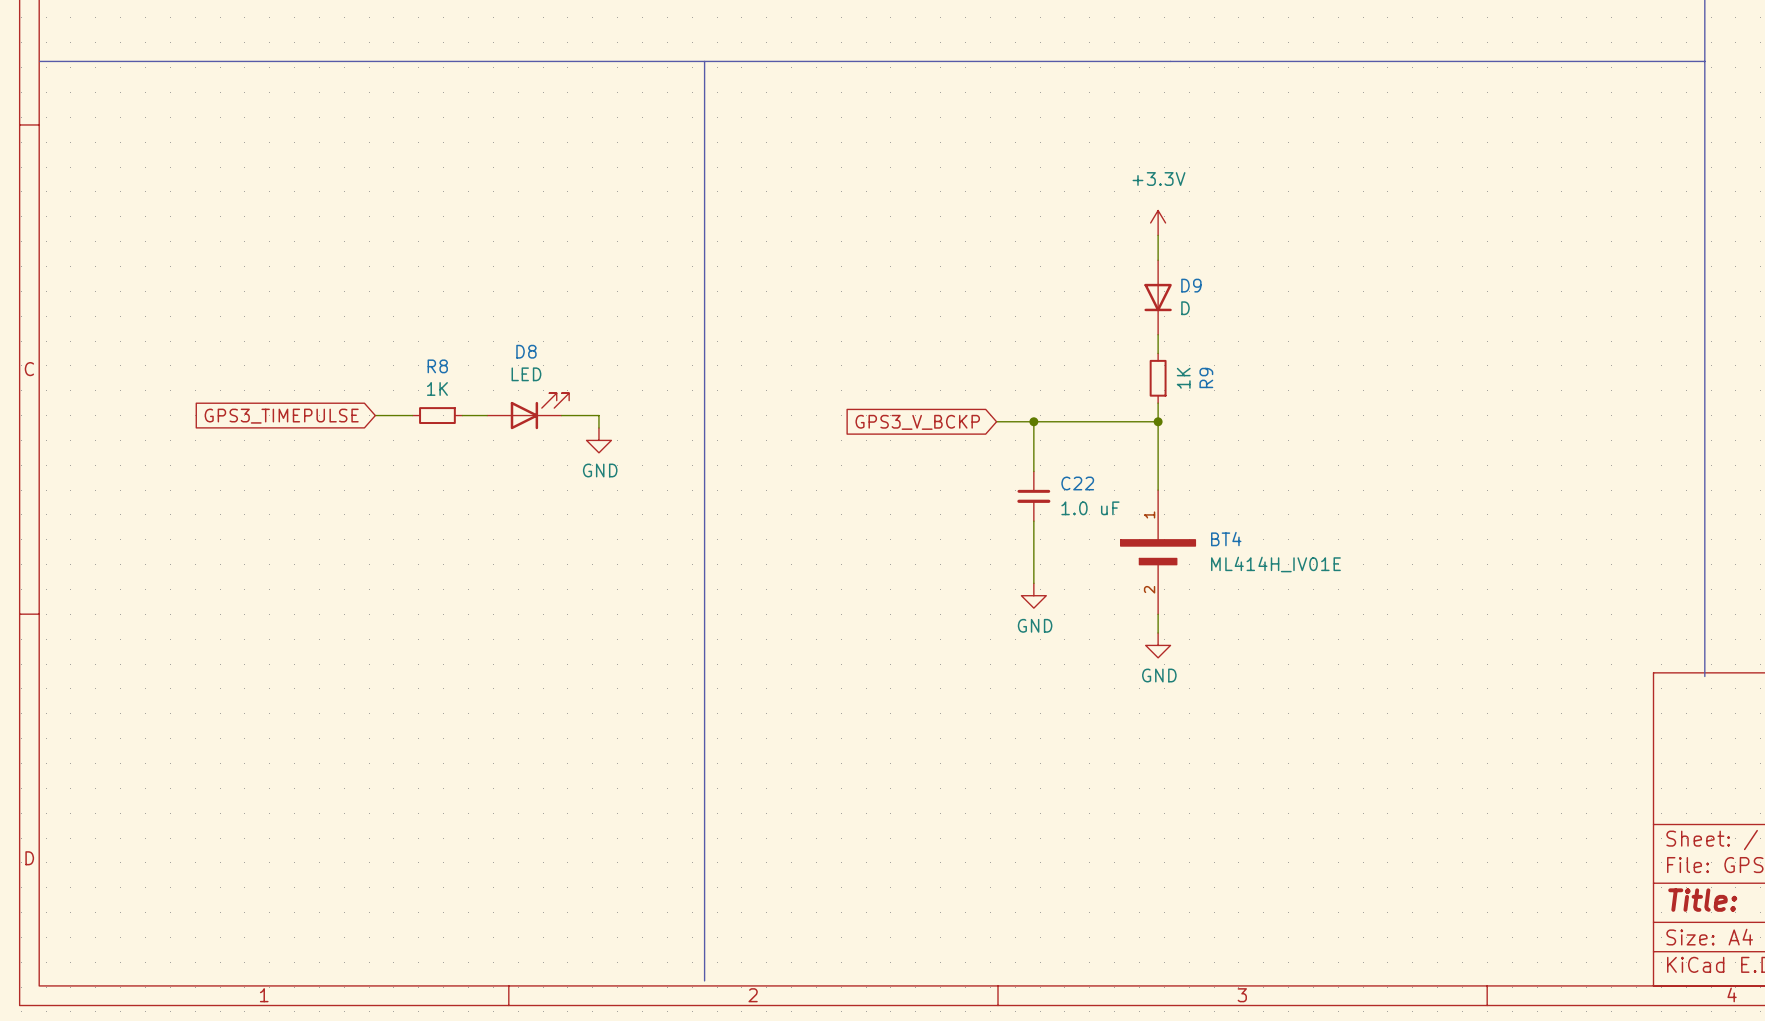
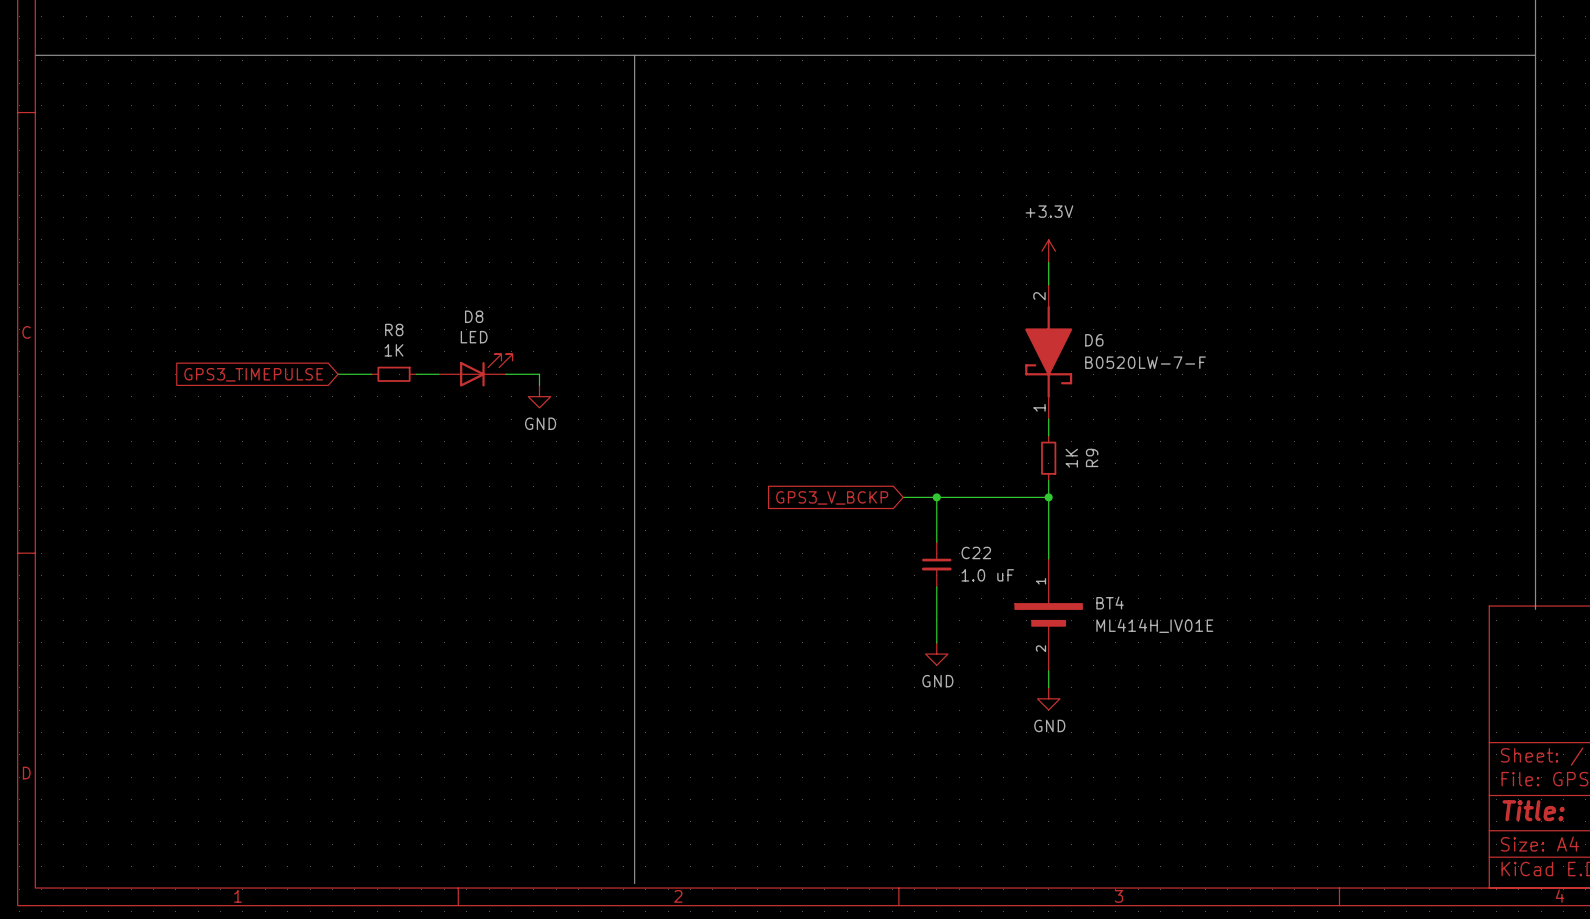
power symbol position: +3.3V (1158, 222) -> +3.3V (1048, 251)
wire: (1158, 235) (1158, 260) -> (1048, 262) (1048, 284)
D9: D (1158, 297) -> none
wire: (1158, 334) (1158, 353) -> (1048, 419) (1048, 435)
R9 position: (1158, 378) -> (1048, 458)
D6: none -> B0520LW-7-F (1048, 351)
wire: (1158, 403) (1158, 490) -> (1048, 480) (1048, 558)
wire: (996, 421) (1158, 421) -> (903, 497) (1048, 497)
wire: (1033, 421) (1033, 471) -> (936, 497) (936, 542)
junction: (1033, 421) -> none
junction: (1158, 421) -> none
global label position: GPS3_V_BCKP (917, 422) -> GPS3_V_BCKP (832, 497)
C22 position: (1033, 496) -> (936, 564)
wire: (1033, 521) (1033, 583) -> (936, 586) (936, 642)
junction: none -> (936, 497)
BT4 position: (1158, 552) -> (1048, 614)
junction: none -> (1048, 497)
power symbol: GND (1033, 595) -> none
wire: (1158, 614) (1158, 632) -> (1048, 670) (1048, 687)
power symbol: GND (1158, 645) -> none
power symbol: none -> GND (936, 654)
power symbol: none -> GND (1048, 698)

